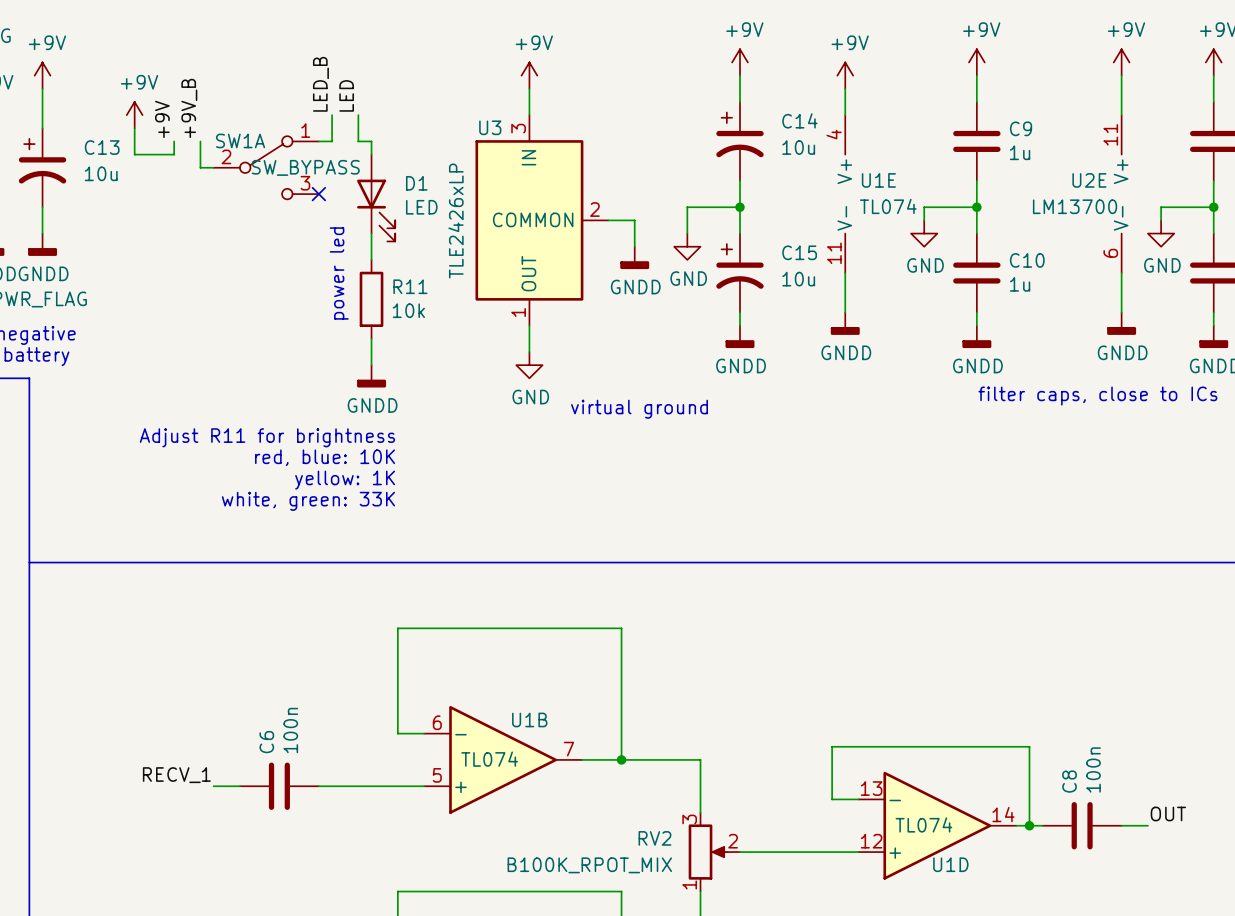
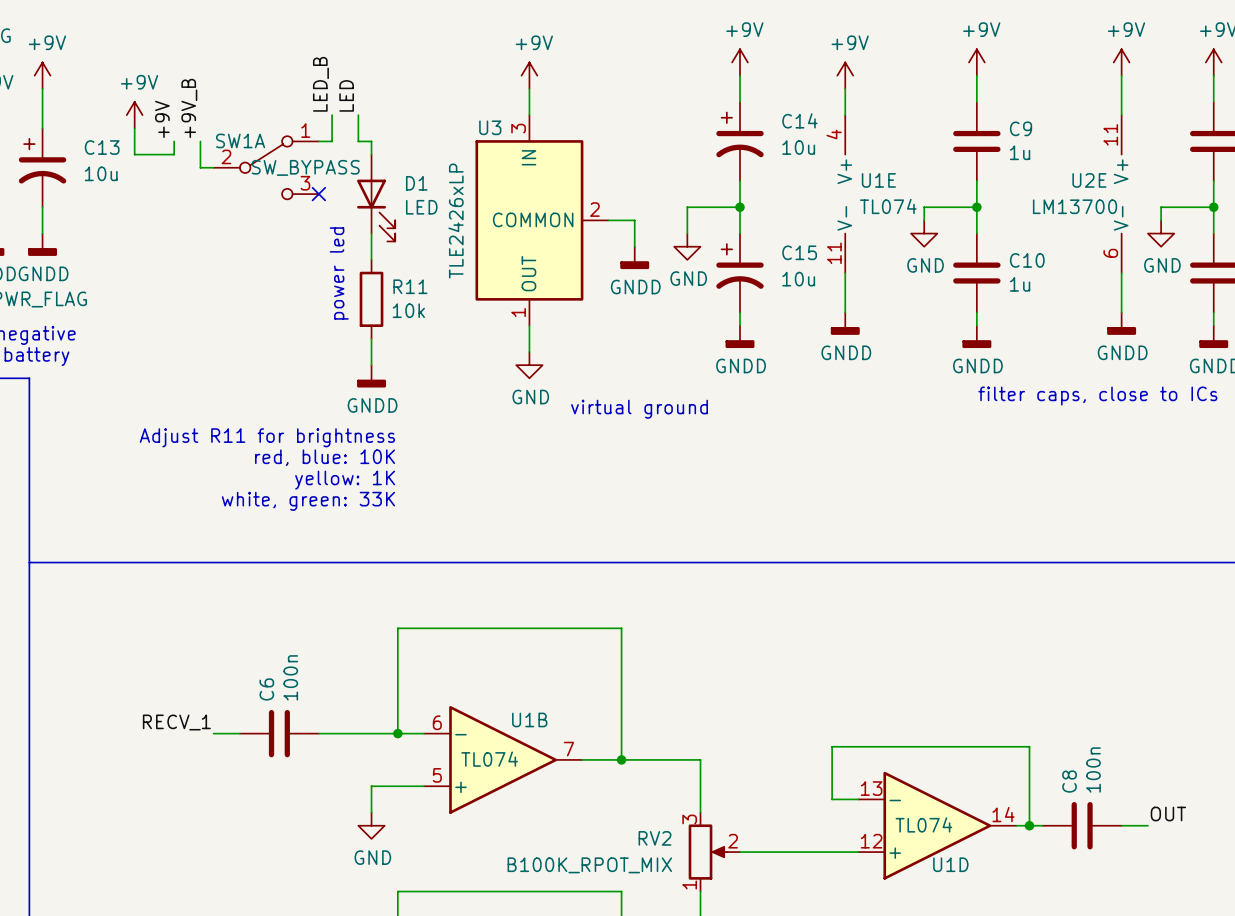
wire: none -> (318, 733) (397, 733)
junction: none -> (397, 733)
label position: RECV_1 (176, 775) -> RECV_1 (176, 722)
wire: (213, 786) (239, 786) -> (213, 733) (239, 733)
C6 position: (279, 786) -> (279, 733)
wire: (318, 786) (371, 786) -> (371, 812) (371, 786)
power symbol: none -> GND (371, 825)

